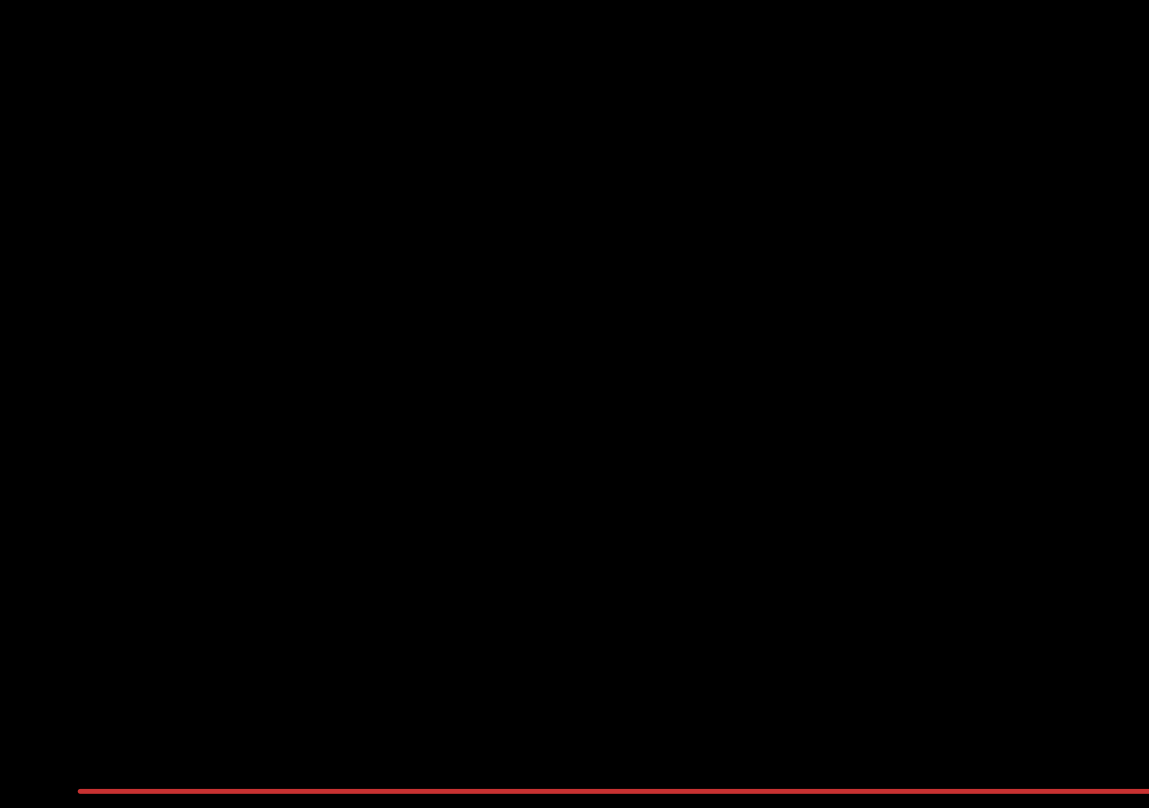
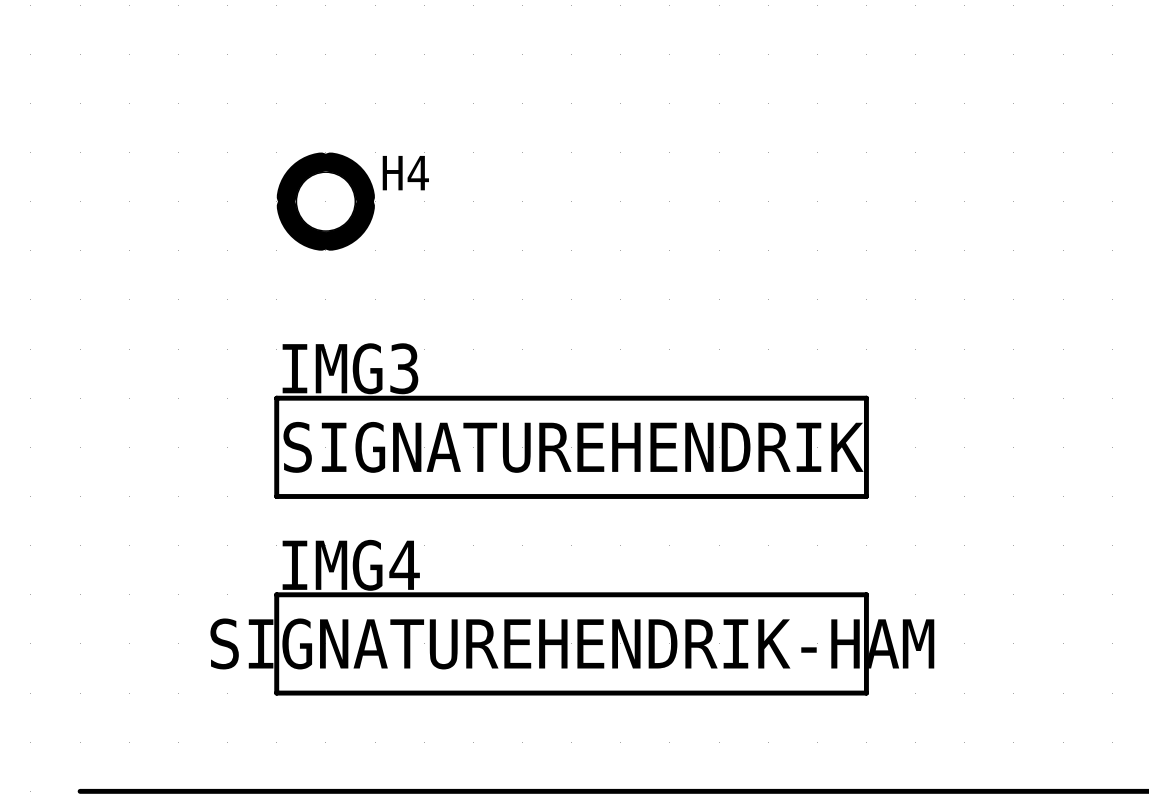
H4: none -> (325, 201)
IMG3: none -> SIGNATUREHENDRIK (571, 447)
IMG4: none -> SIGNATUREHENDRIK-HAM (571, 643)

